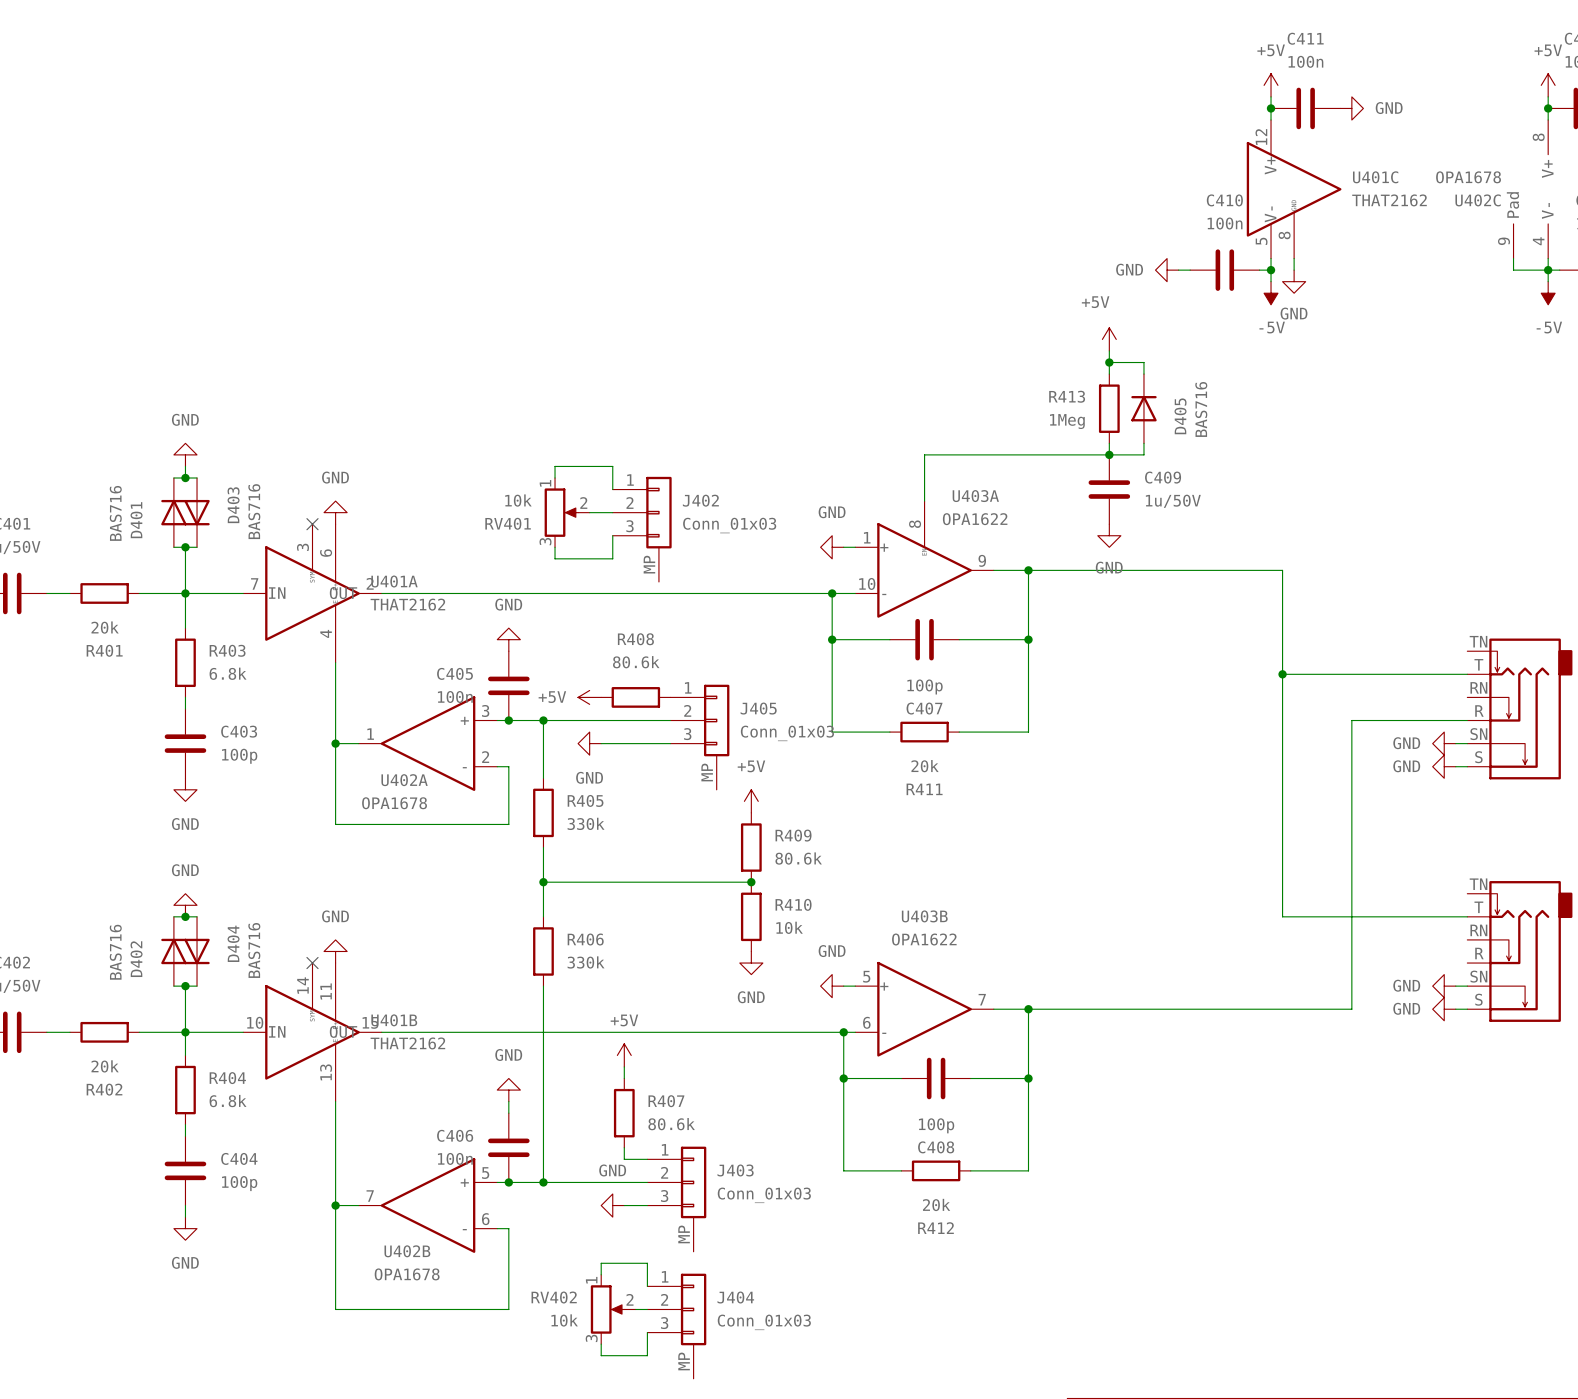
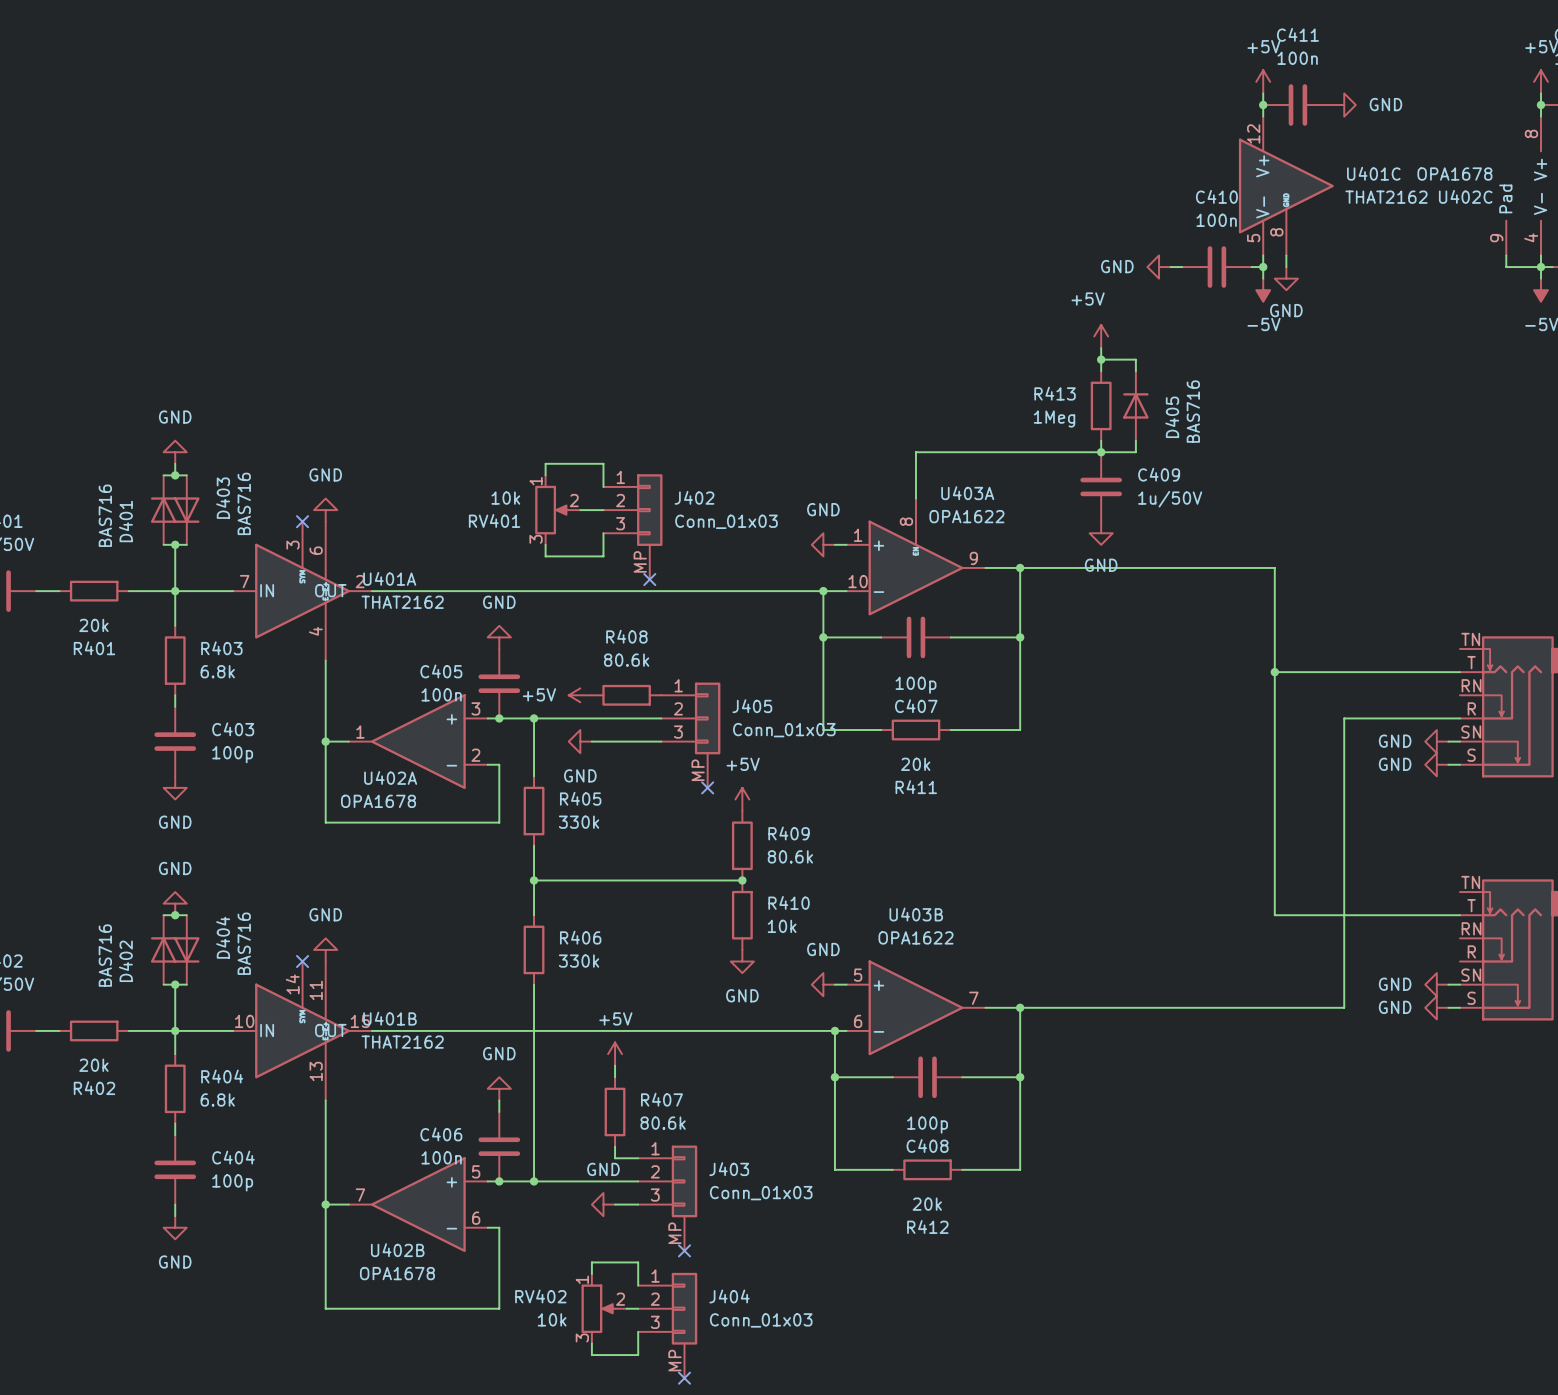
no-connect mark: none -> (649, 579)
no-connect mark: none -> (707, 787)
no-connect mark: none -> (684, 1250)
no-connect mark: none -> (684, 1378)

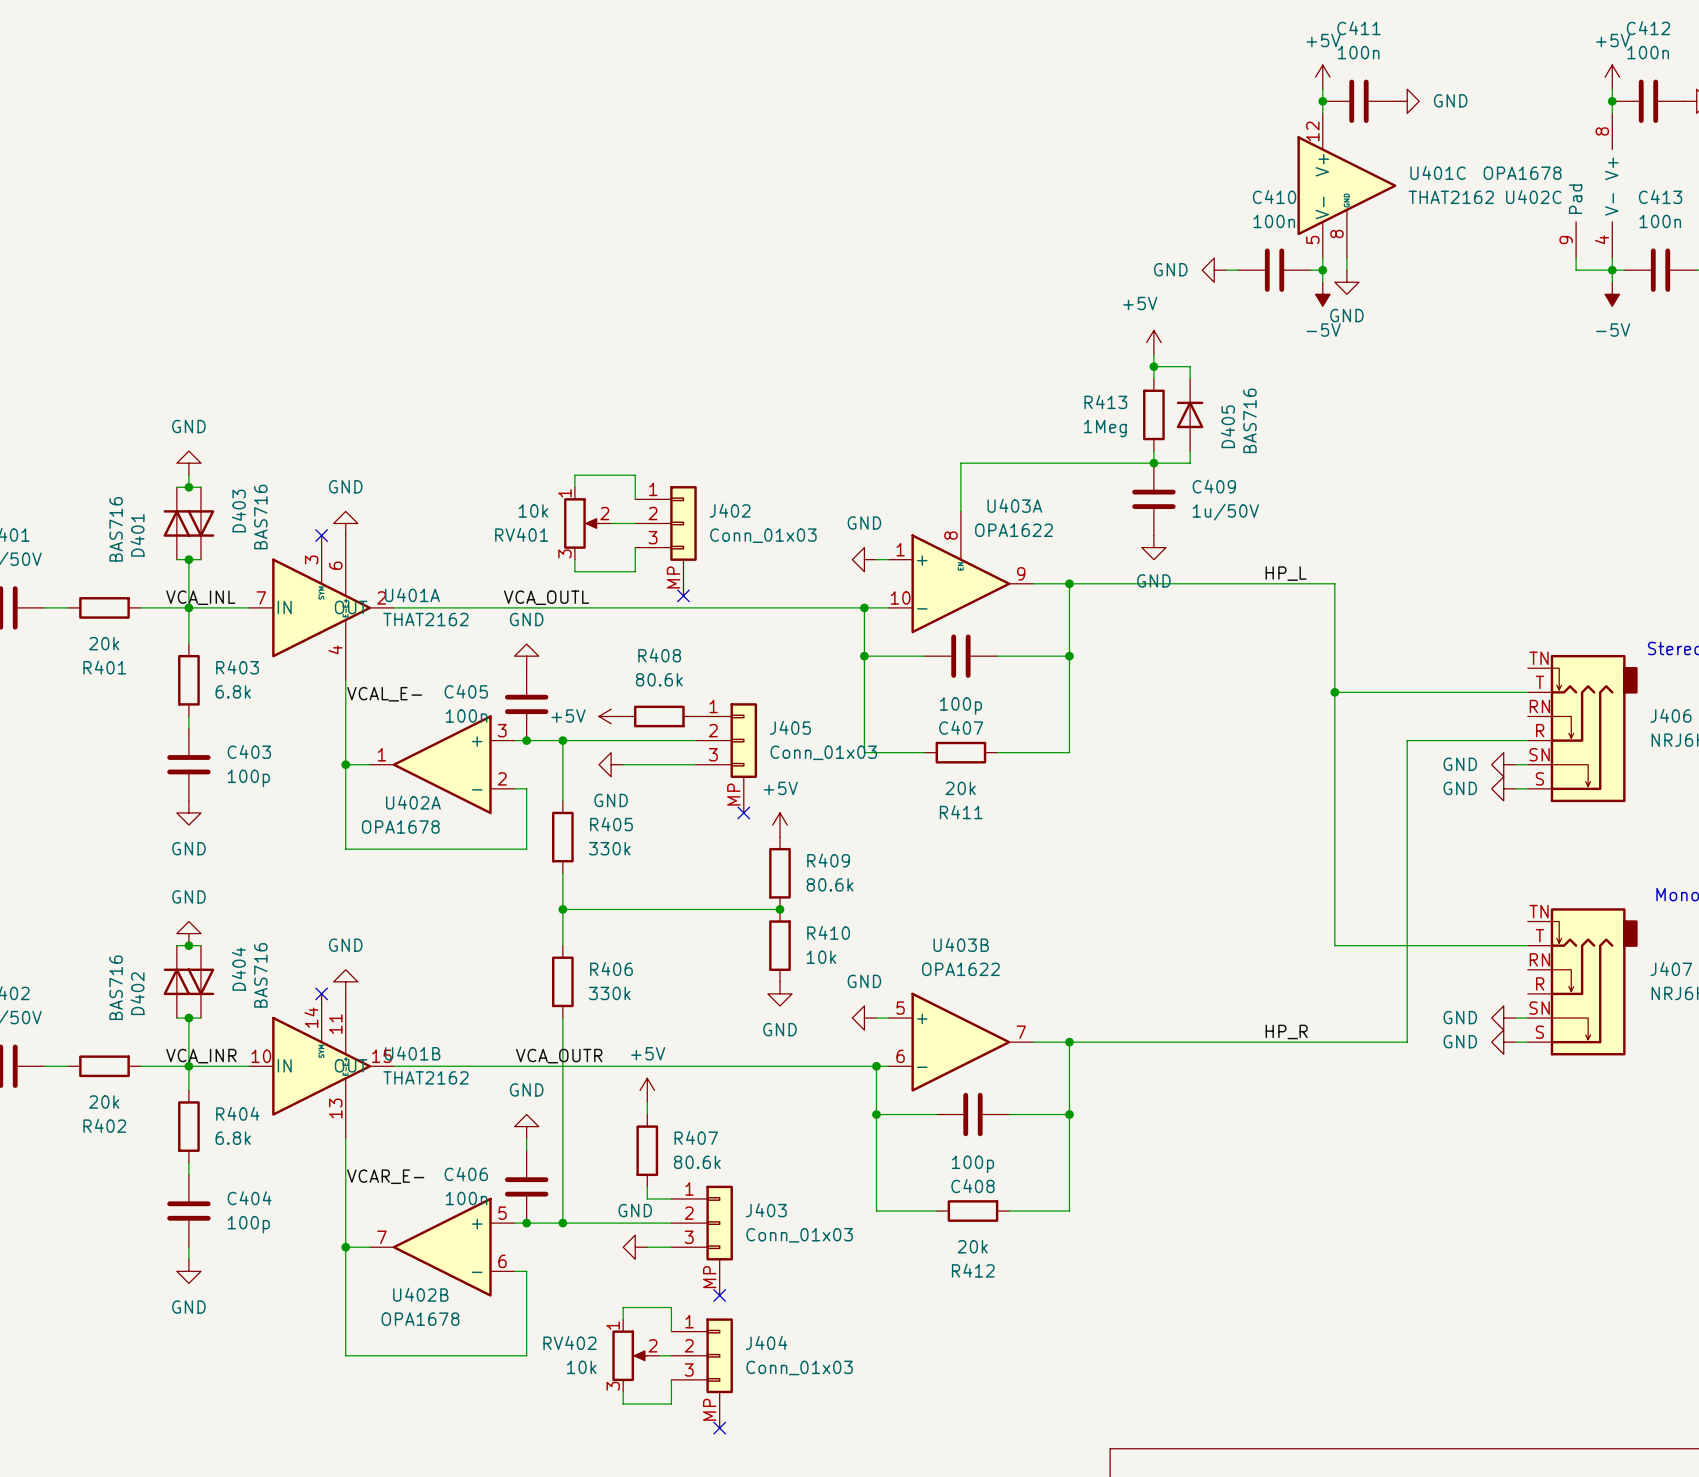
label: none -> HP_L (1286, 573)
label: none -> VCA_INL (200, 597)
label: none -> VCA_OUTL (546, 597)
label: none -> VCAL_E- (384, 694)
label: none -> HP_R (1286, 1031)
label: none -> VCA_INR (201, 1056)
label: none -> VCA_OUTR (559, 1056)
label: none -> VCAR_E- (385, 1176)

